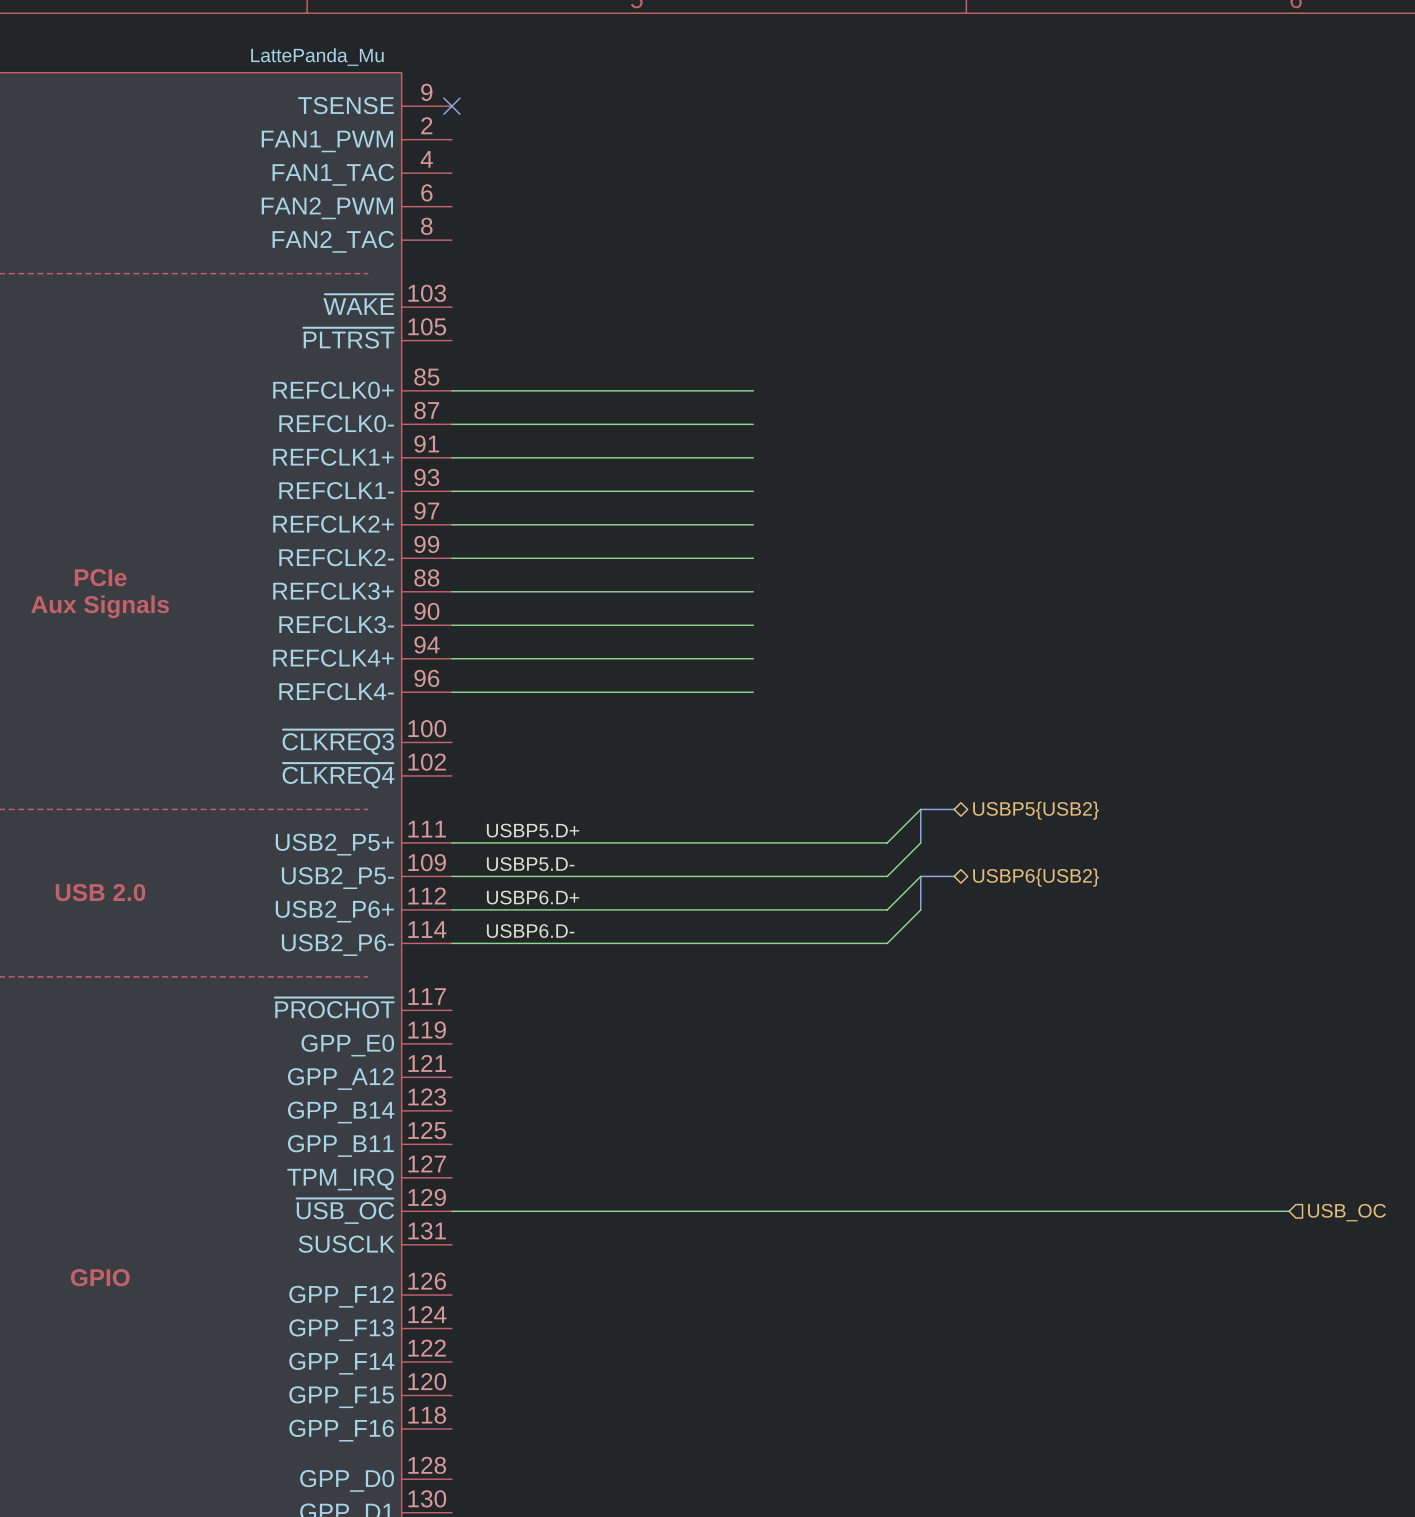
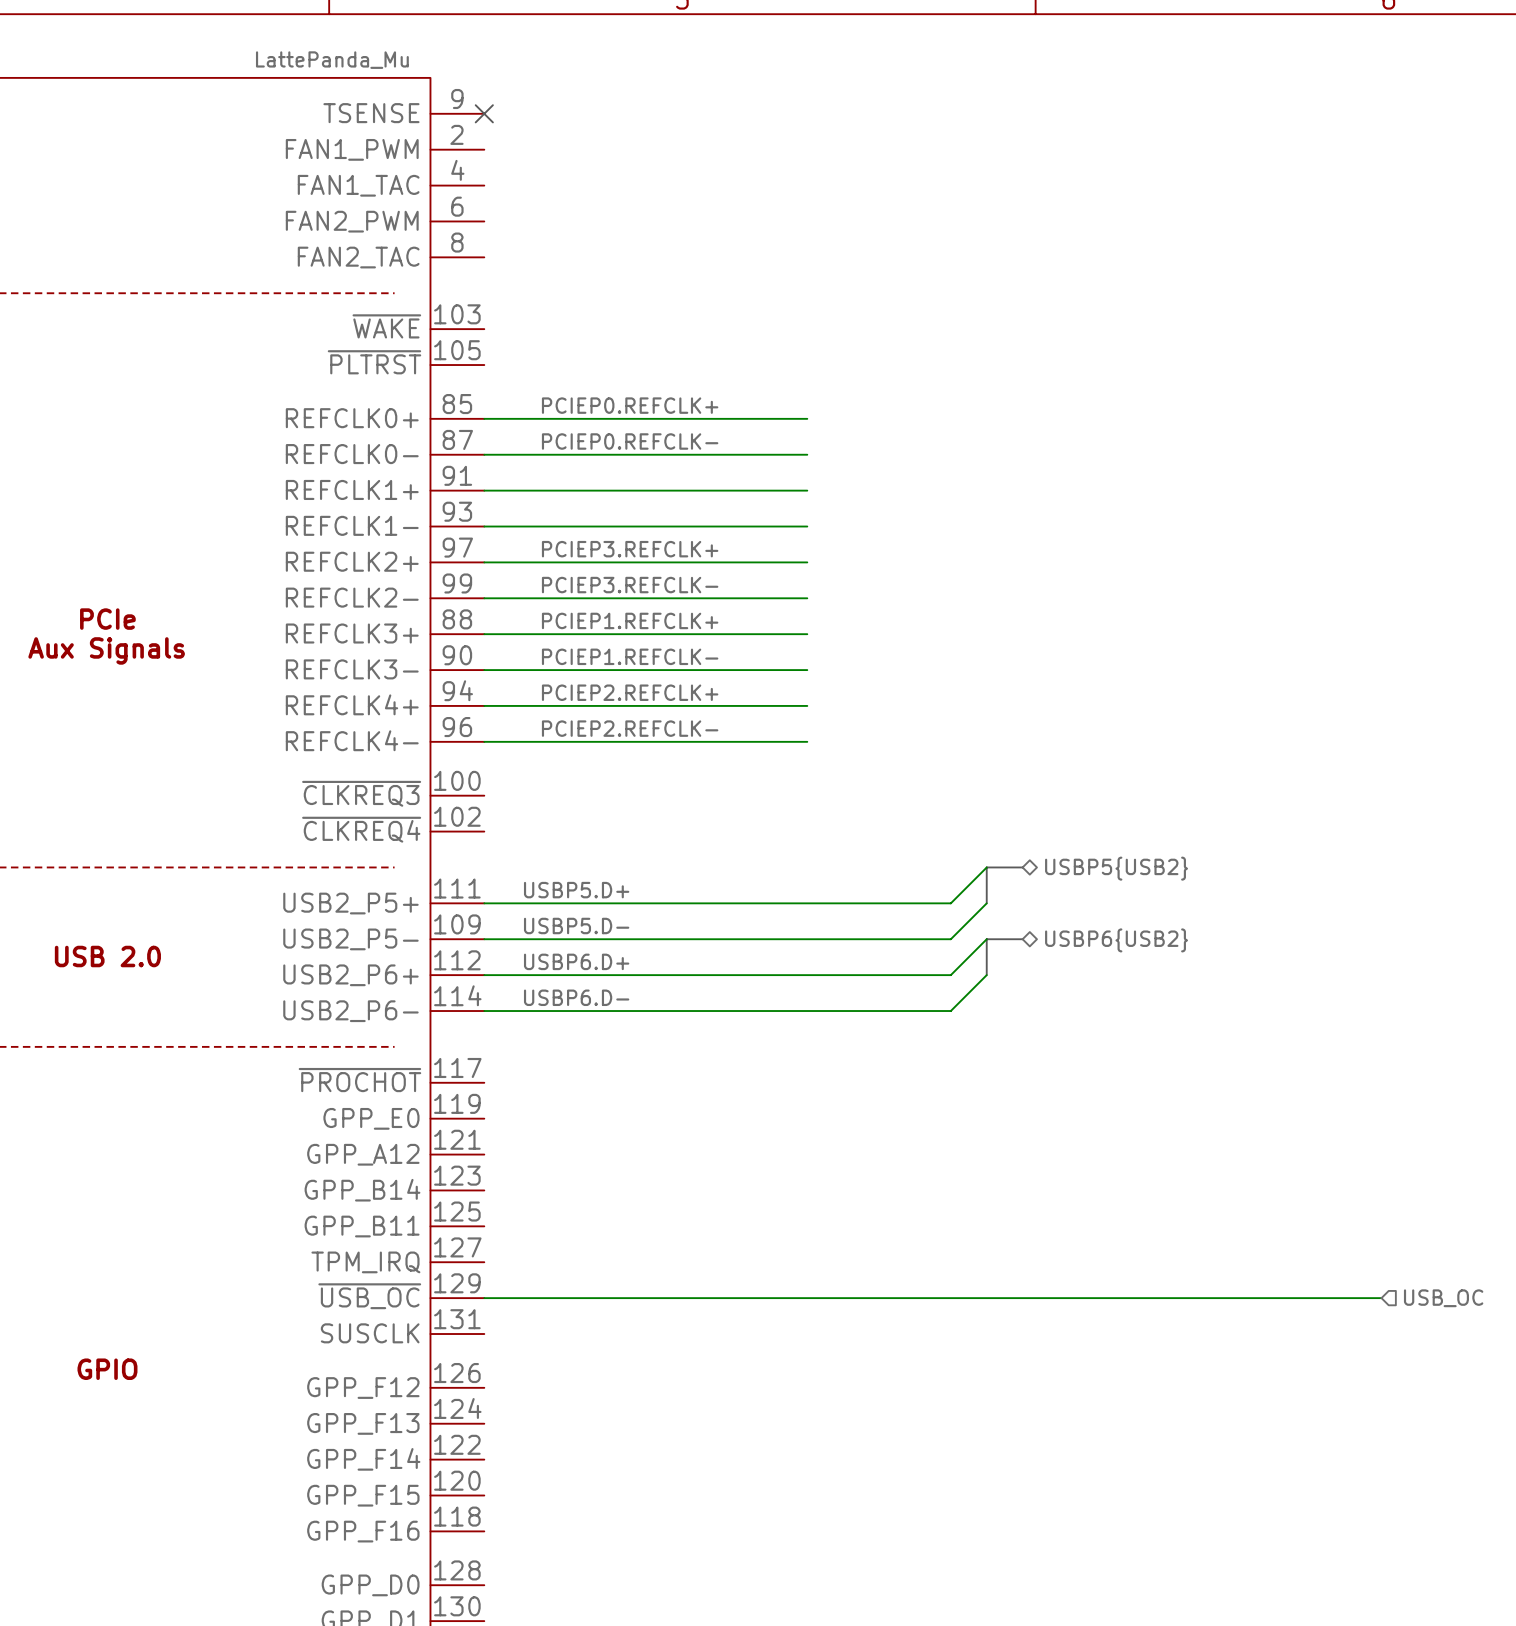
label: none -> PCIEP0.REFCLK+ (630, 405)
label: none -> PCIEP0.REFCLK- (630, 441)
label: none -> PCIEP3.REFCLK+ (630, 549)
label: none -> PCIEP3.REFCLK- (630, 585)
label: none -> PCIEP1.REFCLK+ (630, 620)
label: none -> PCIEP1.REFCLK- (630, 656)
label: none -> PCIEP2.REFCLK+ (630, 692)
label: none -> PCIEP2.REFCLK- (630, 728)

